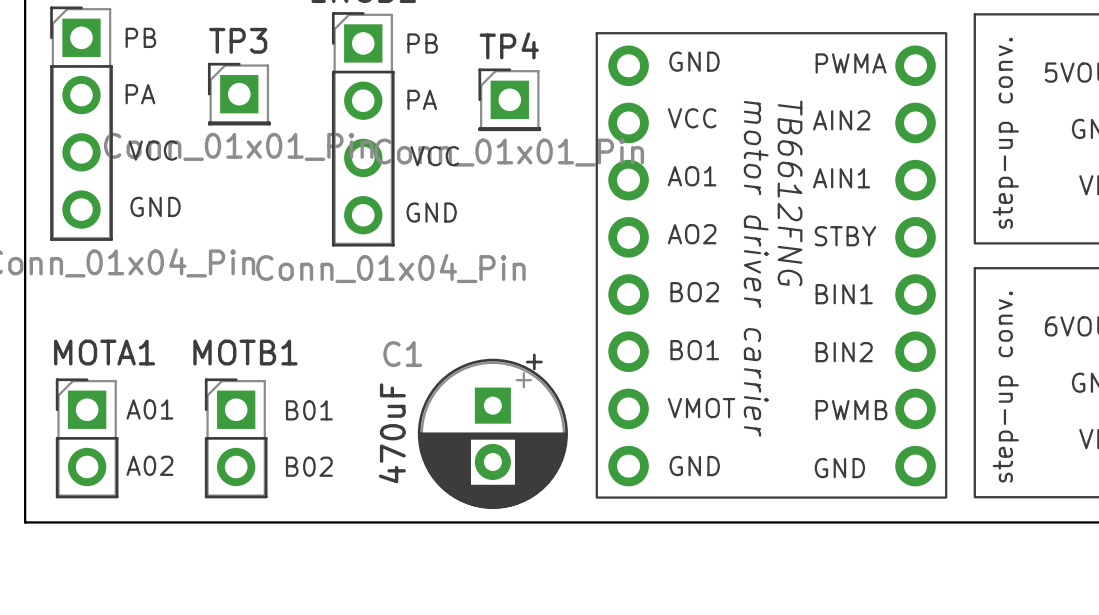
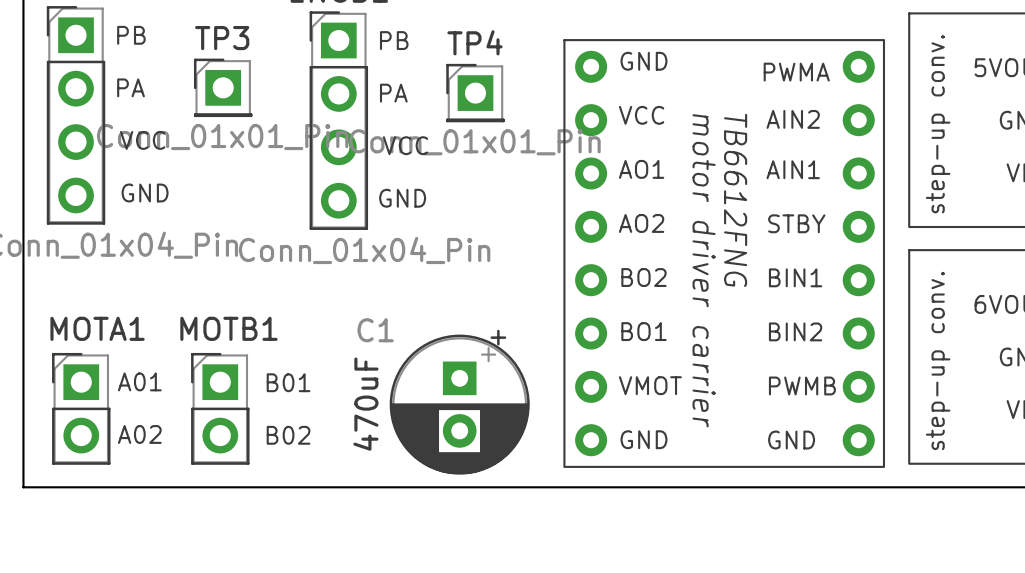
part footprint: [595, 32, 948, 499] -> [563, 39, 886, 468]

